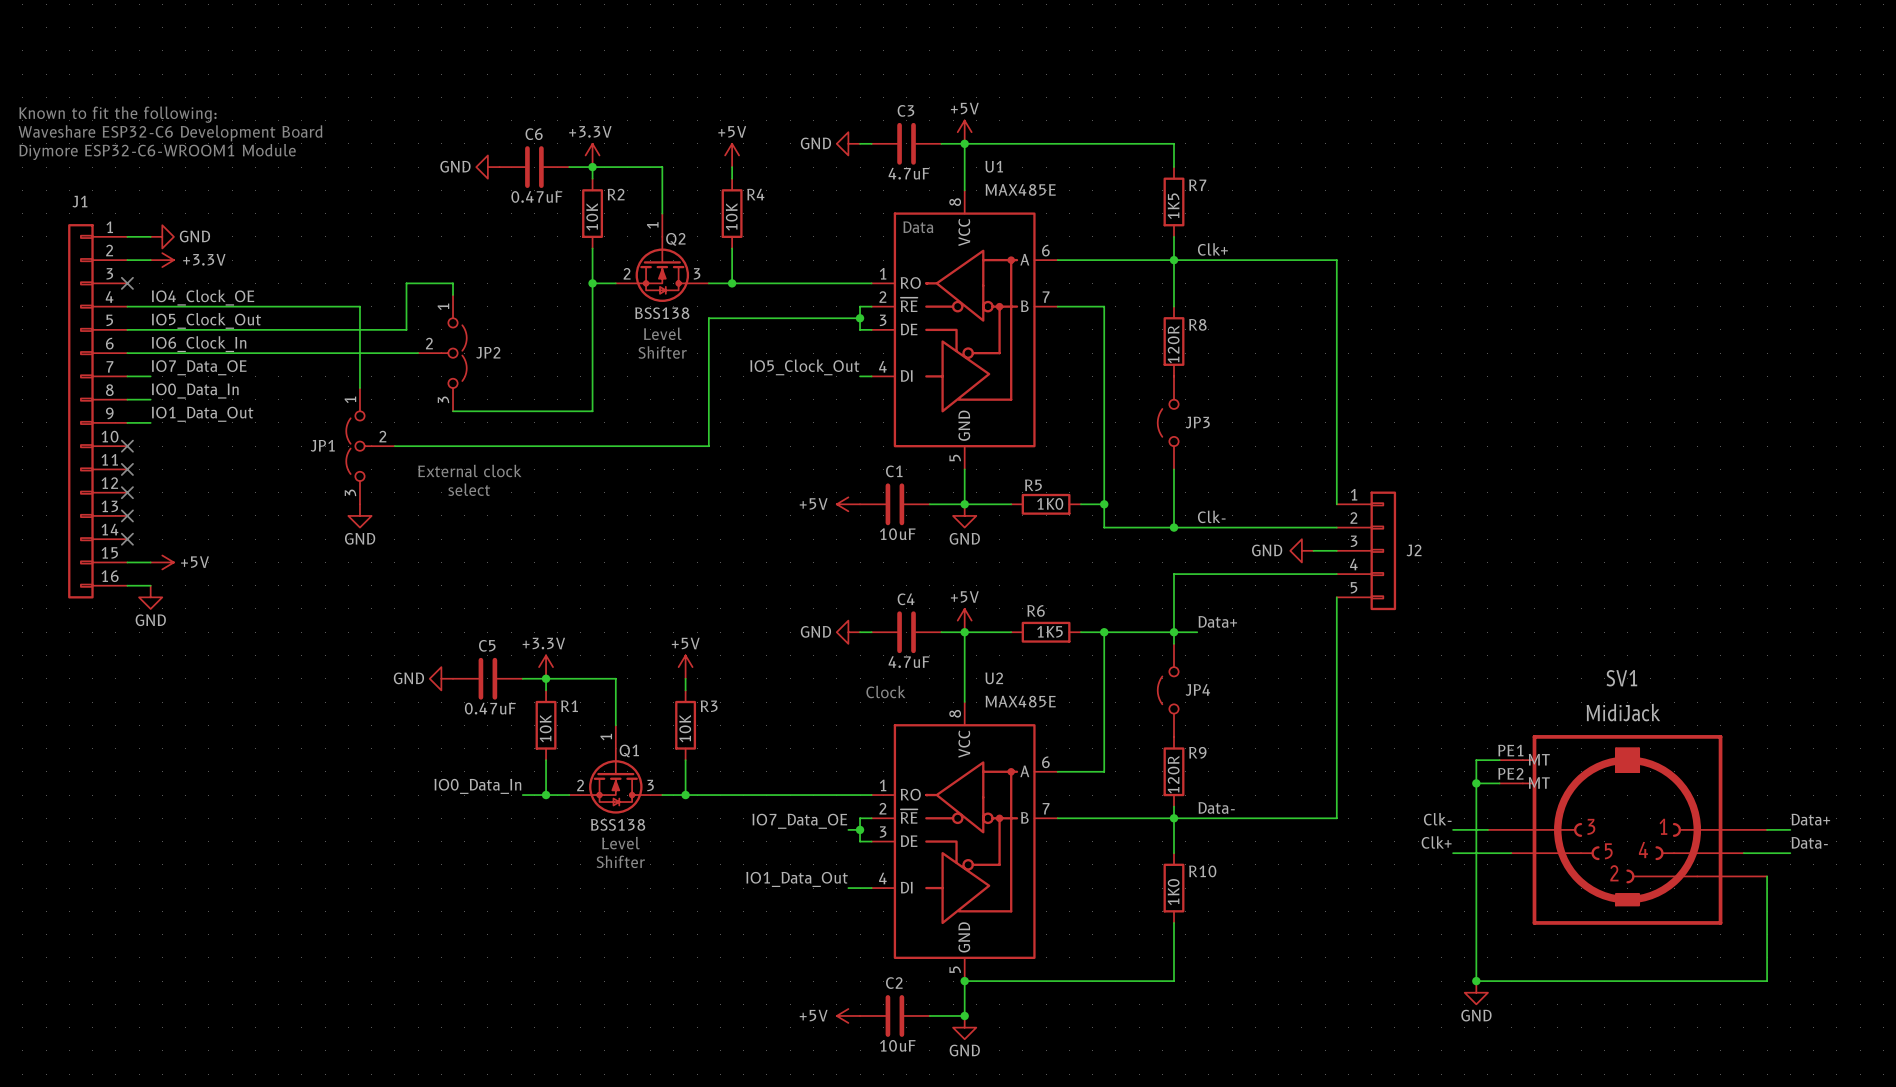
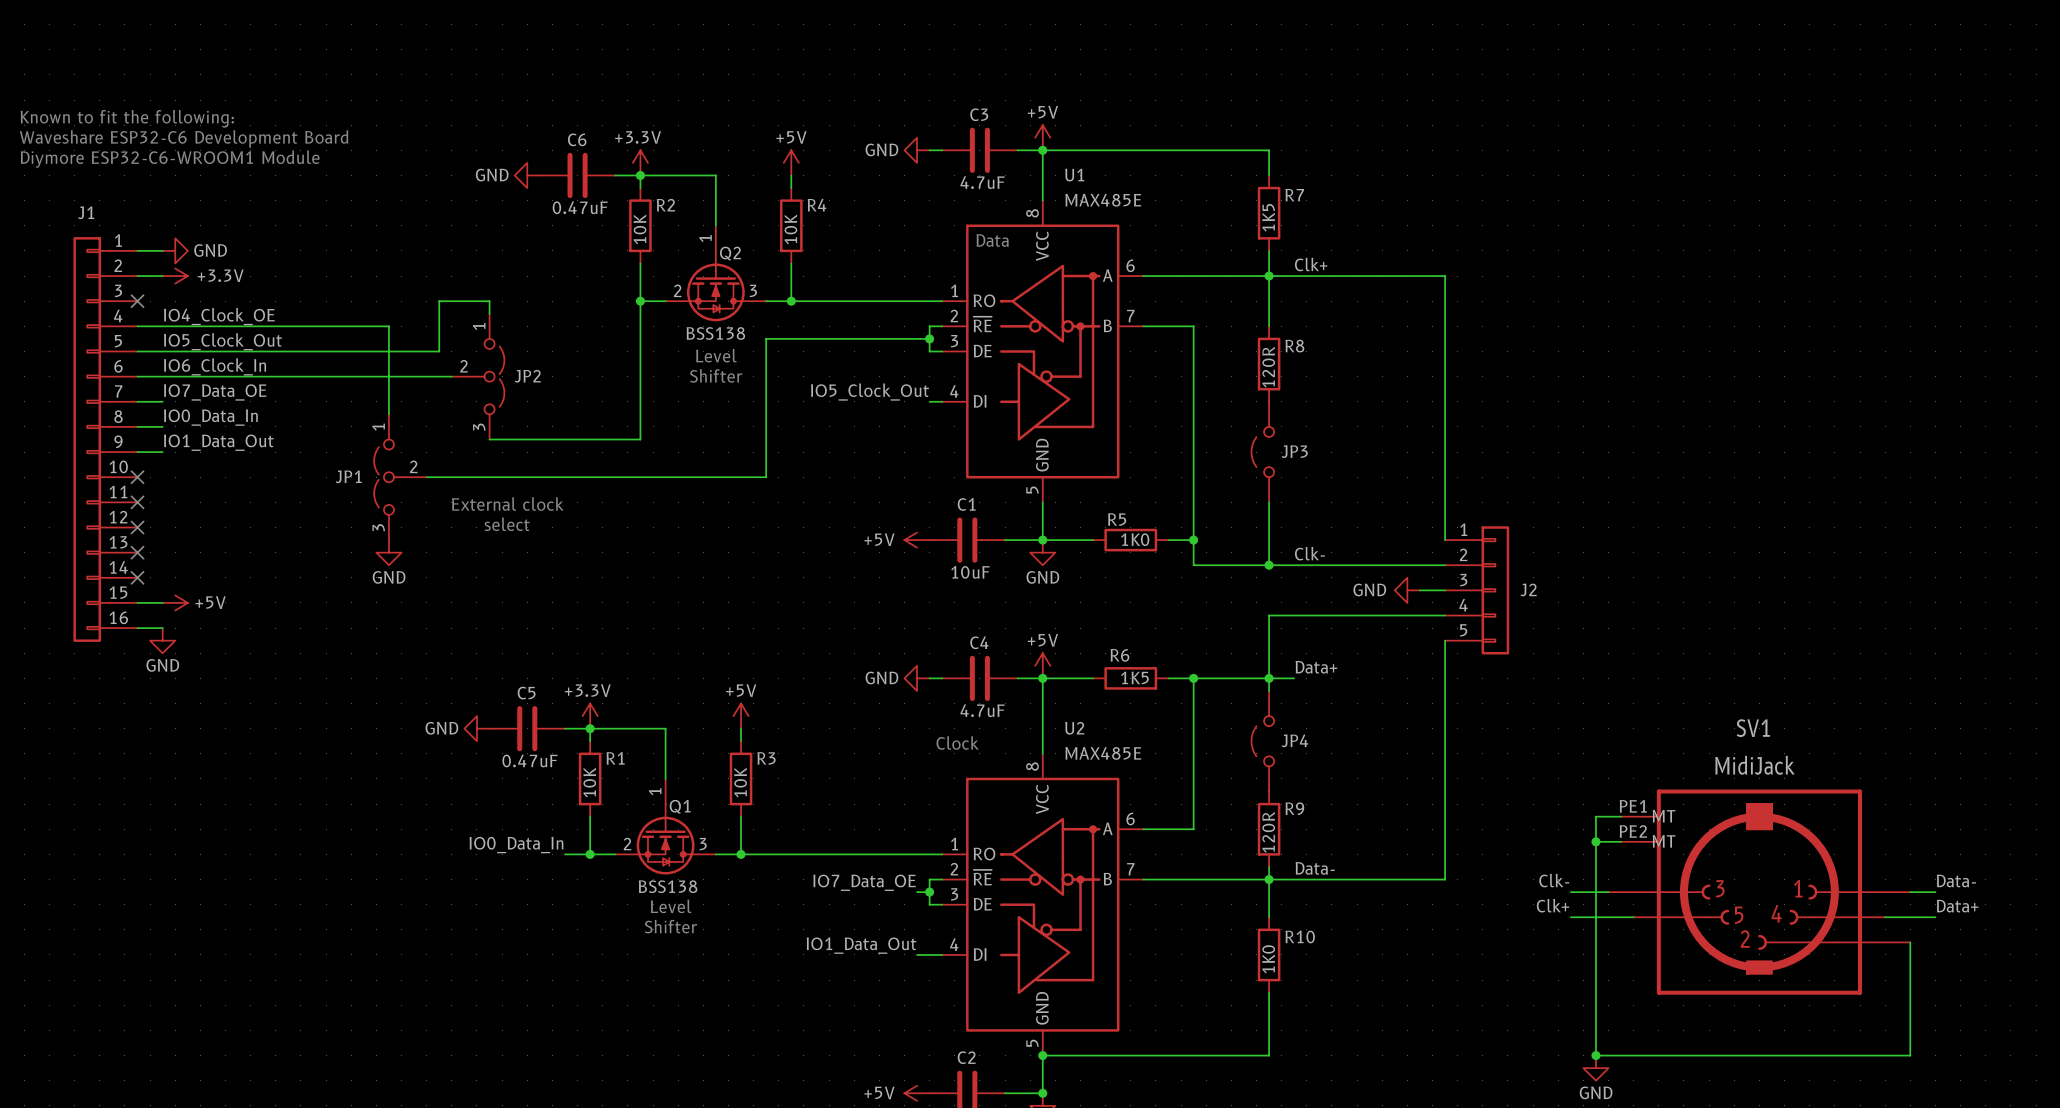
label: Data+ (1810, 819) -> Data- (1956, 881)
label: Data- (1809, 842) -> Data+ (1957, 906)

